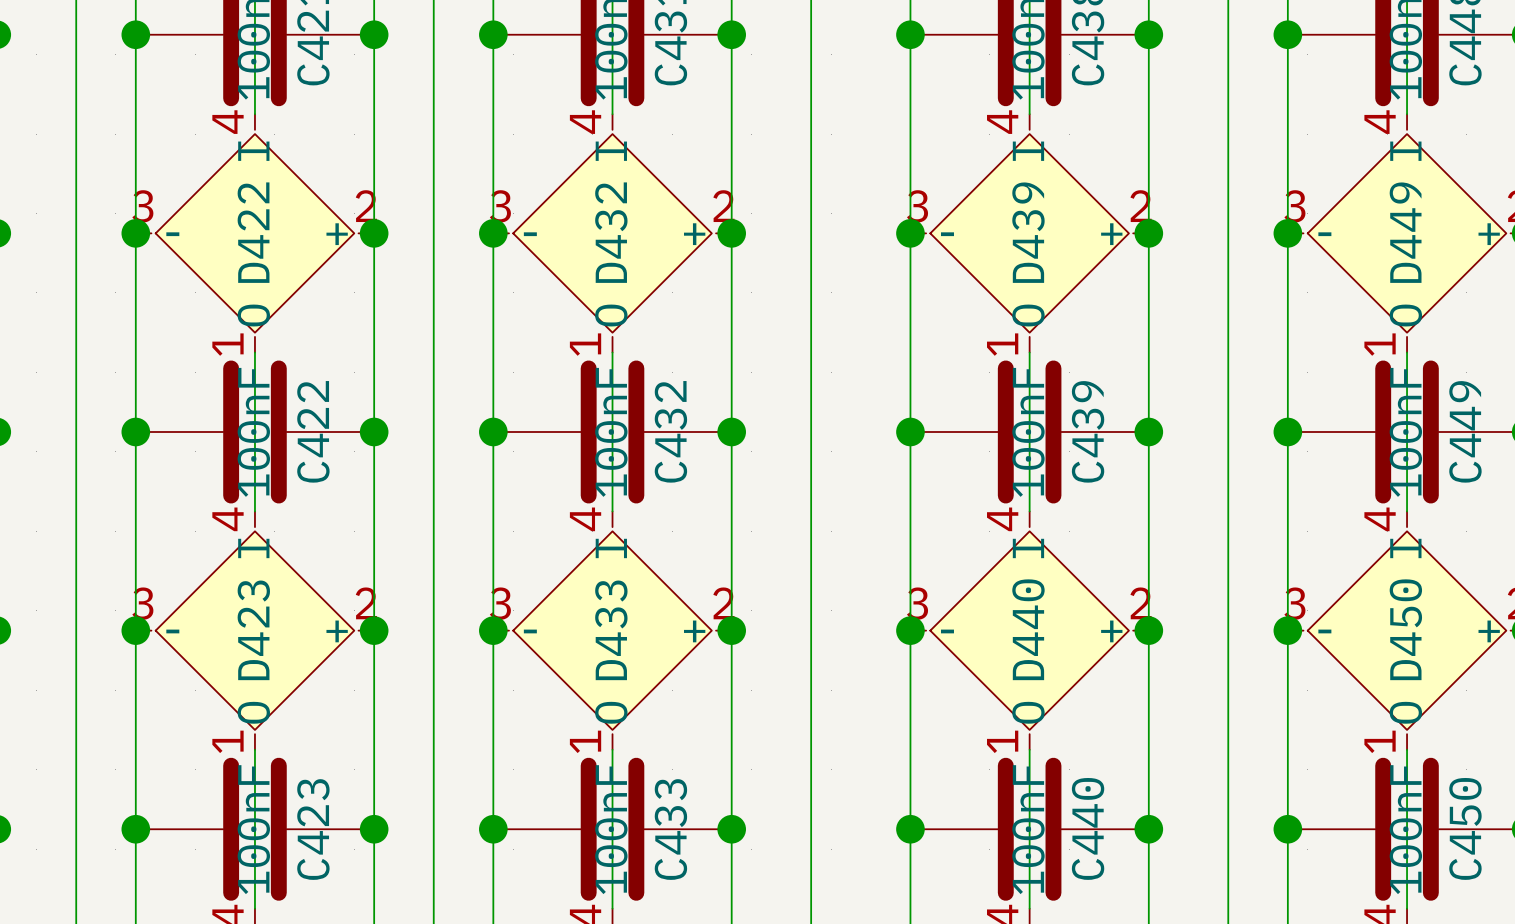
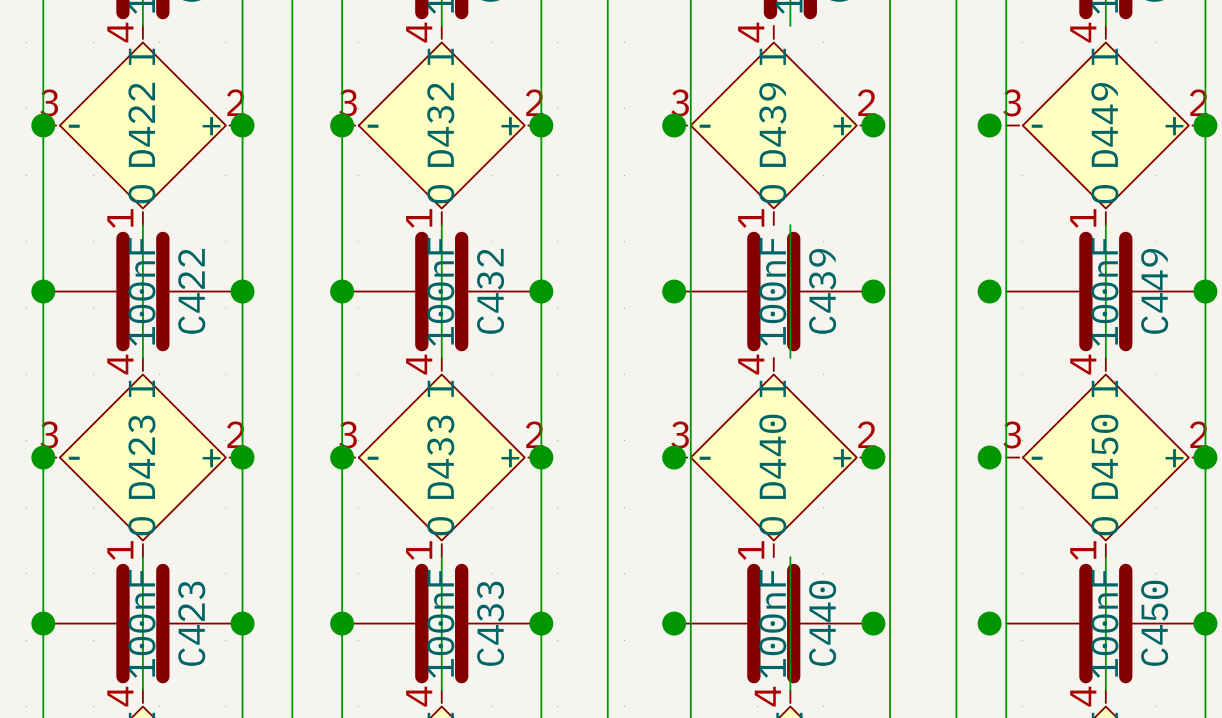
junction position: (910, 233) -> (674, 125)
D439 position: (1029, 233) -> (773, 125)
junction position: (1148, 233) -> (873, 125)
junction position: (1287, 233) -> (989, 125)
junction position: (910, 431) -> (674, 291)
C439 position: (1029, 431) -> (773, 291)
junction position: (1148, 431) -> (873, 291)
junction position: (1287, 431) -> (989, 291)
junction position: (910, 630) -> (674, 457)
D440 position: (1029, 630) -> (773, 457)
junction position: (1148, 630) -> (873, 457)
junction position: (1287, 630) -> (989, 457)
junction position: (910, 829) -> (674, 623)
C440 position: (1029, 829) -> (773, 623)
junction position: (1148, 829) -> (873, 623)
junction position: (1287, 829) -> (989, 623)

